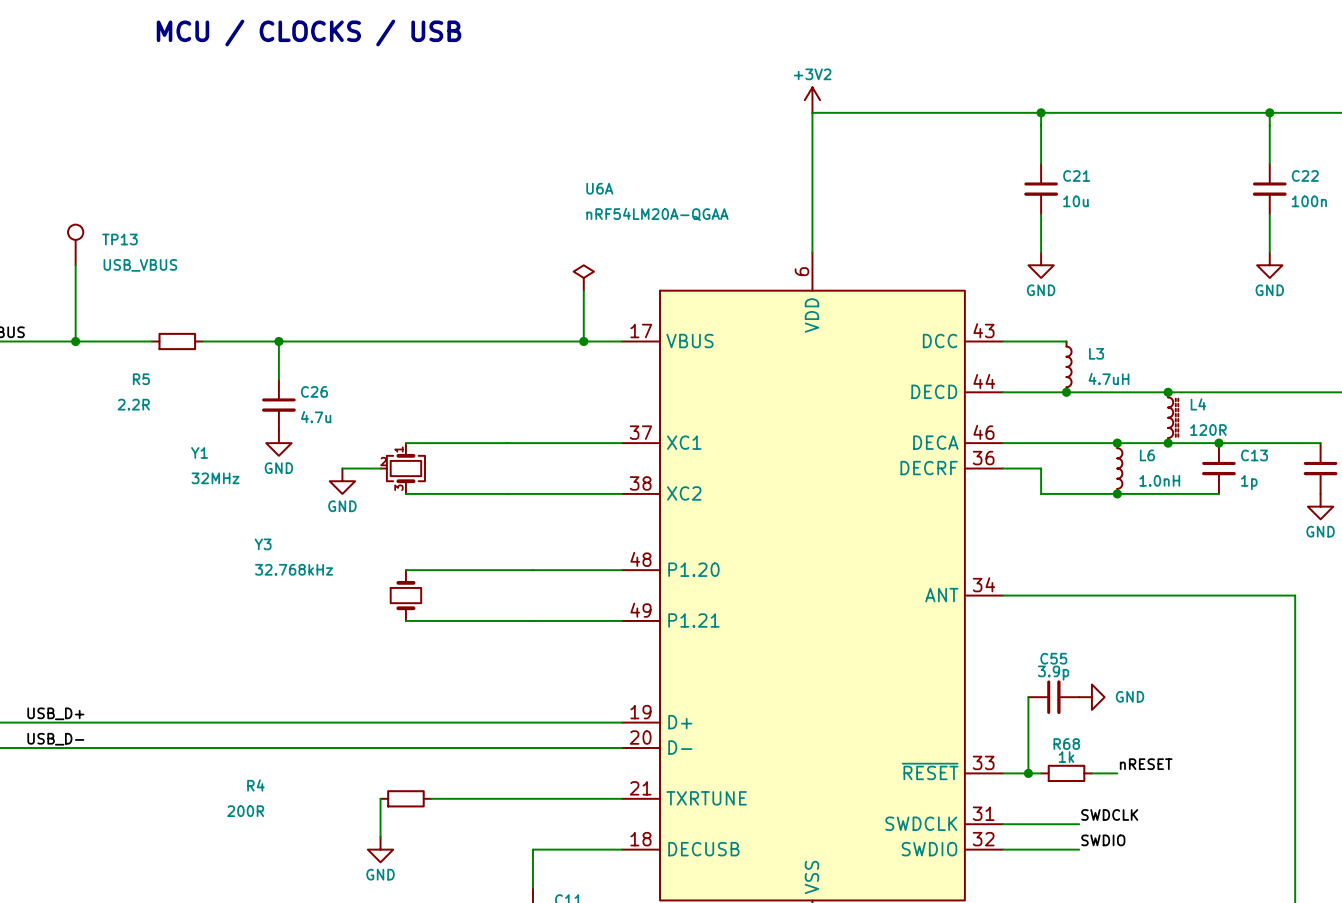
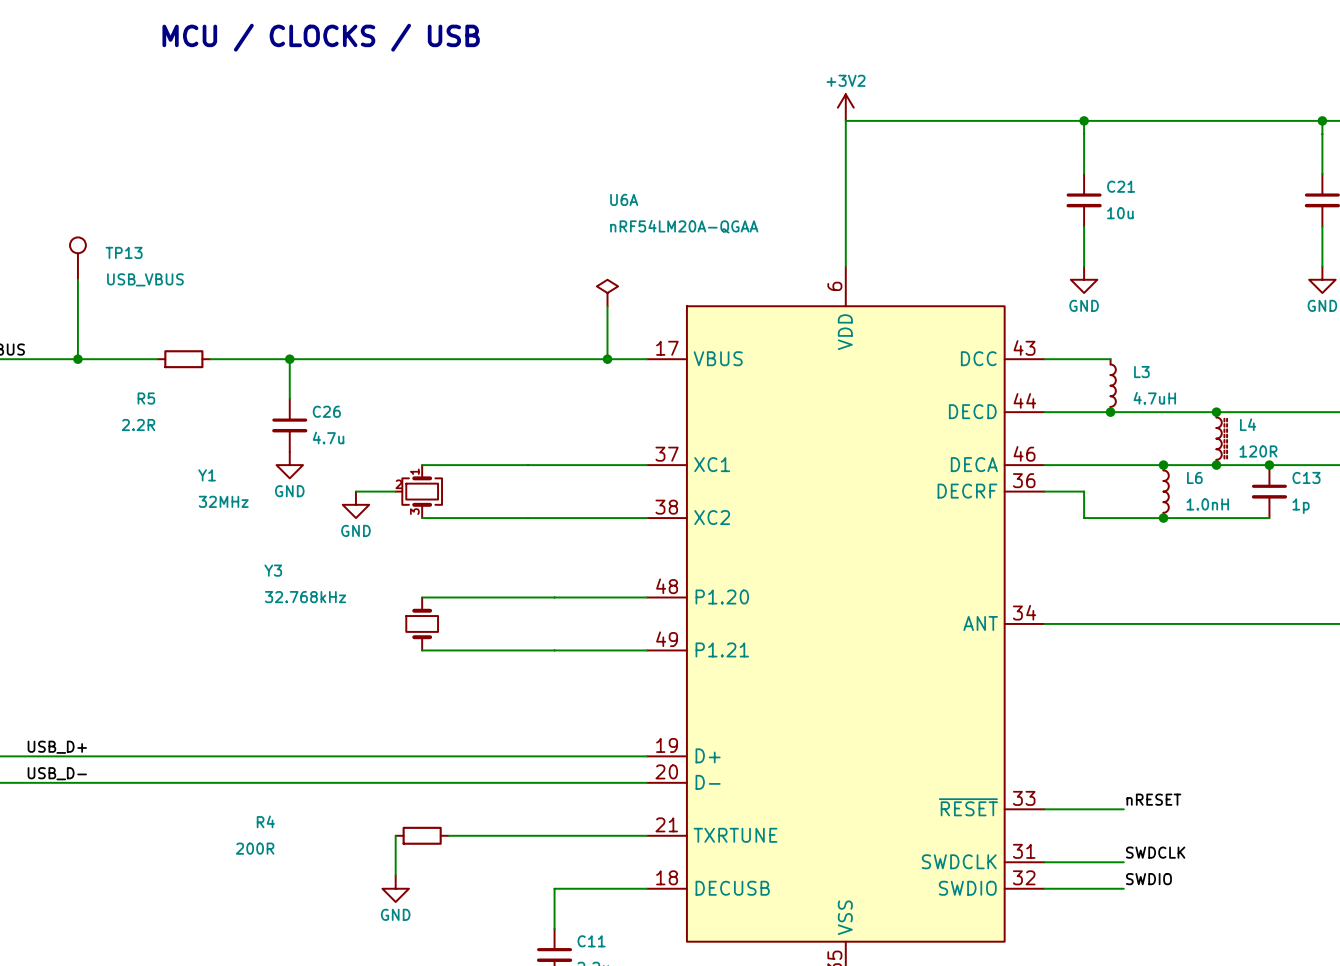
wire: (1028, 697) (1028, 773) -> none
C55: 3.9p (1053, 697) -> none
power symbol: GND (1091, 697) -> none
label position: nRESET (1146, 764) -> nRESET (1153, 799)
junction: (1028, 773) -> none
wire: none -> (1084, 809) (1123, 809)
R68: 1k (1066, 773) -> none
wire: (1091, 773) (1117, 773) -> none

